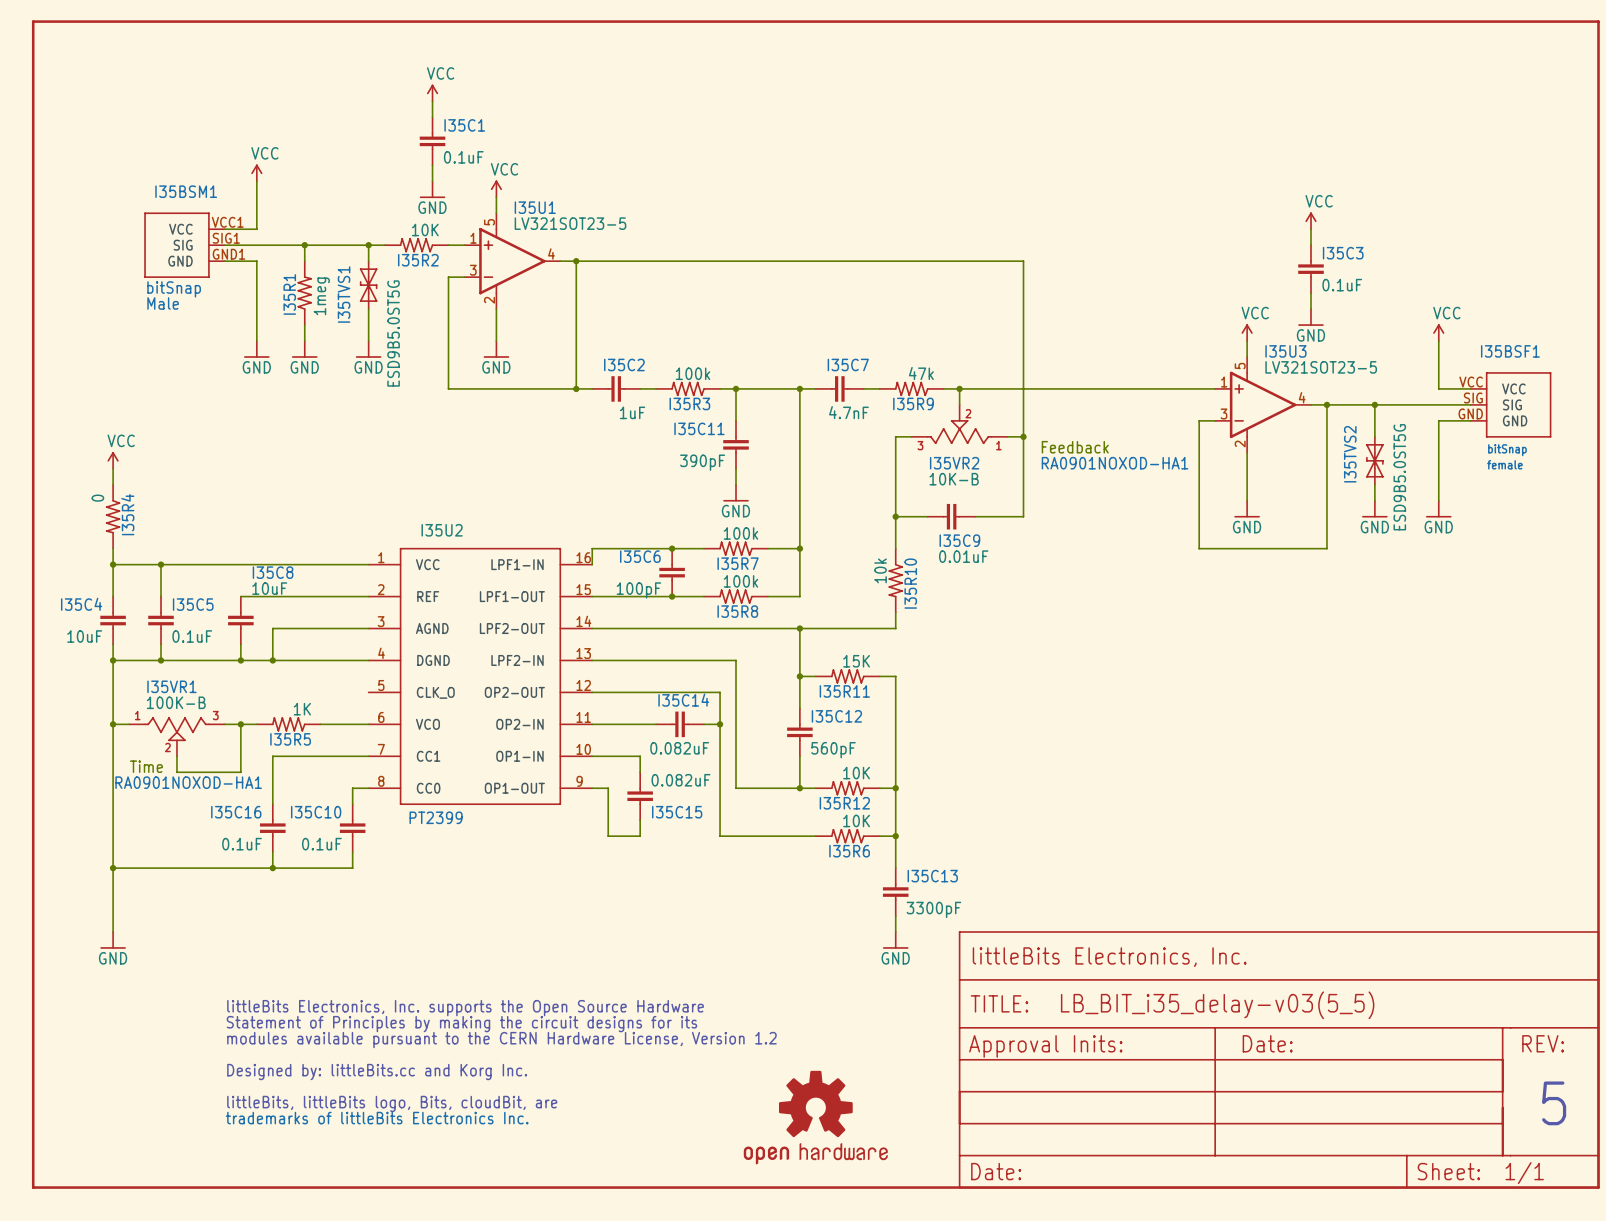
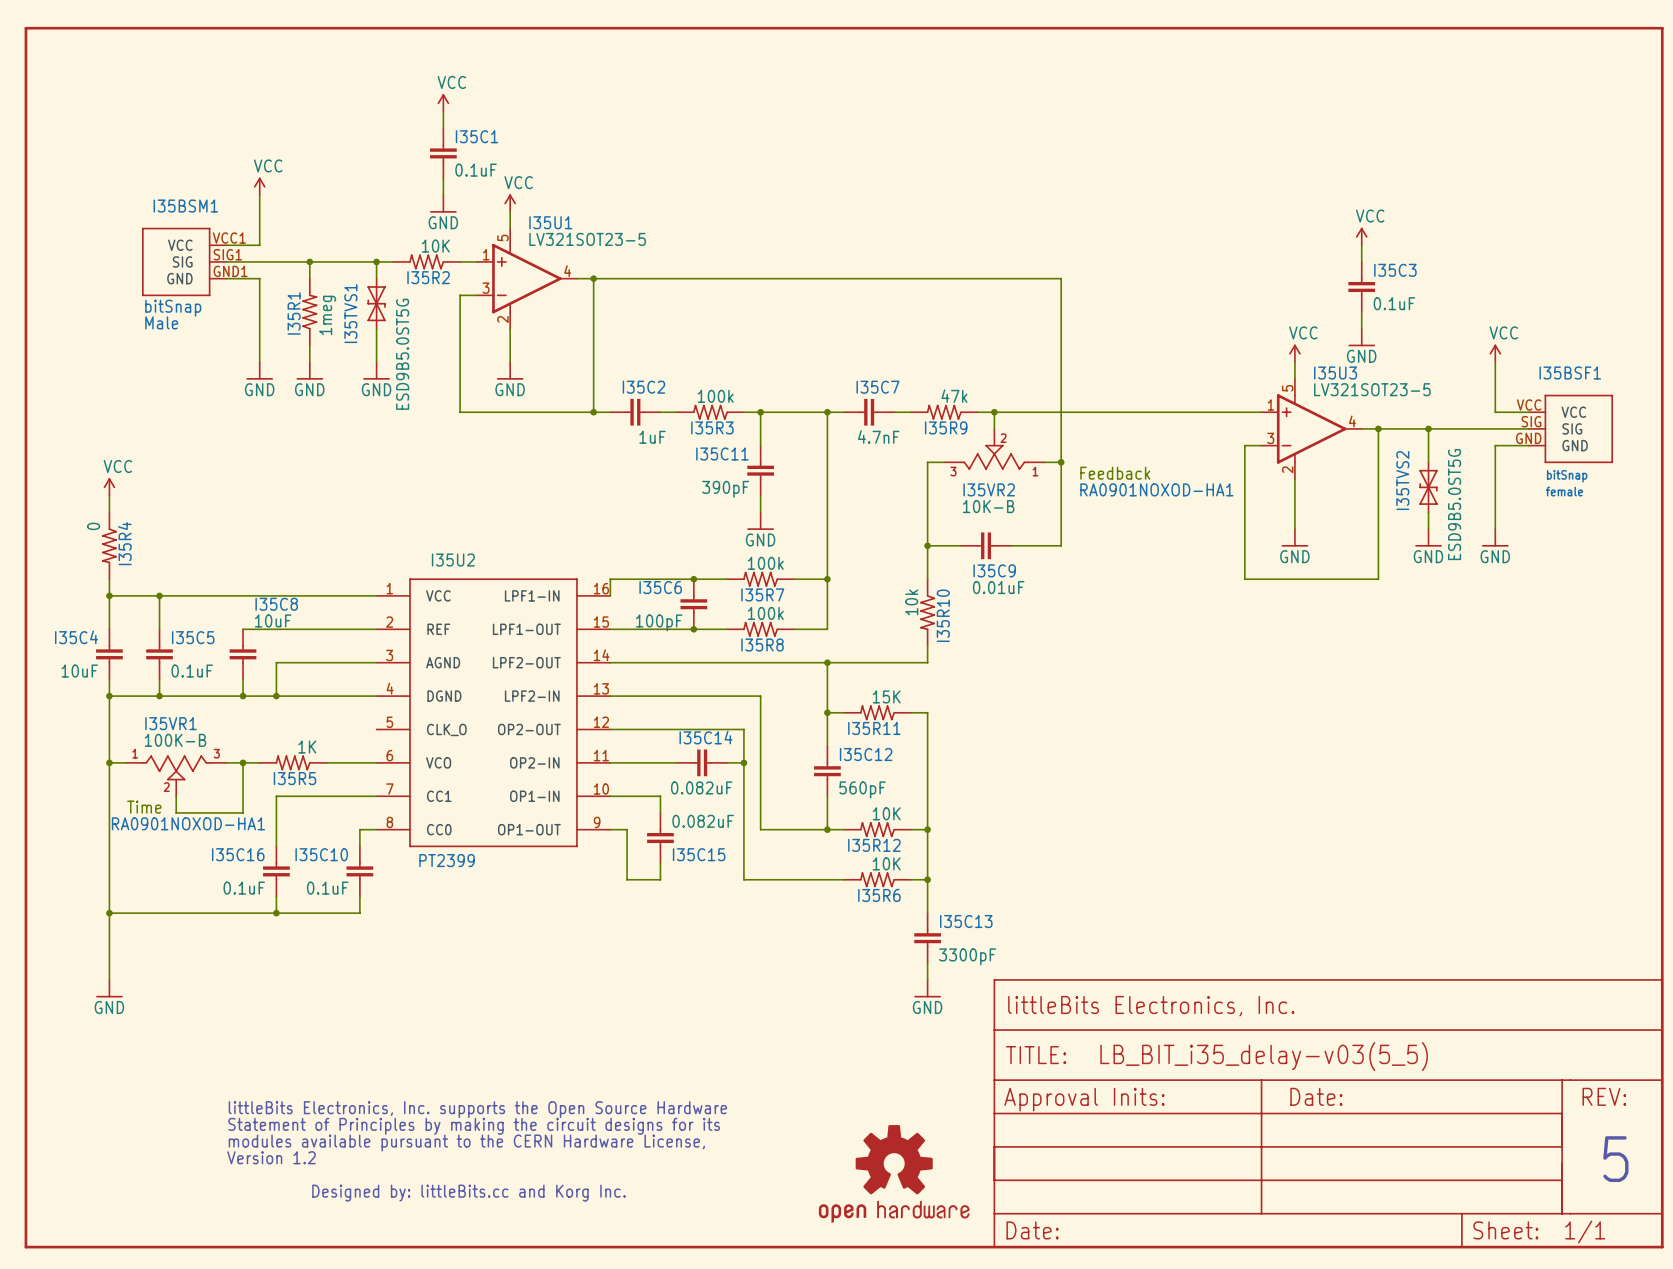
part: (501, 1062) -> none
part: none -> (477, 1151)
part position: (815, 1117) -> (894, 1173)

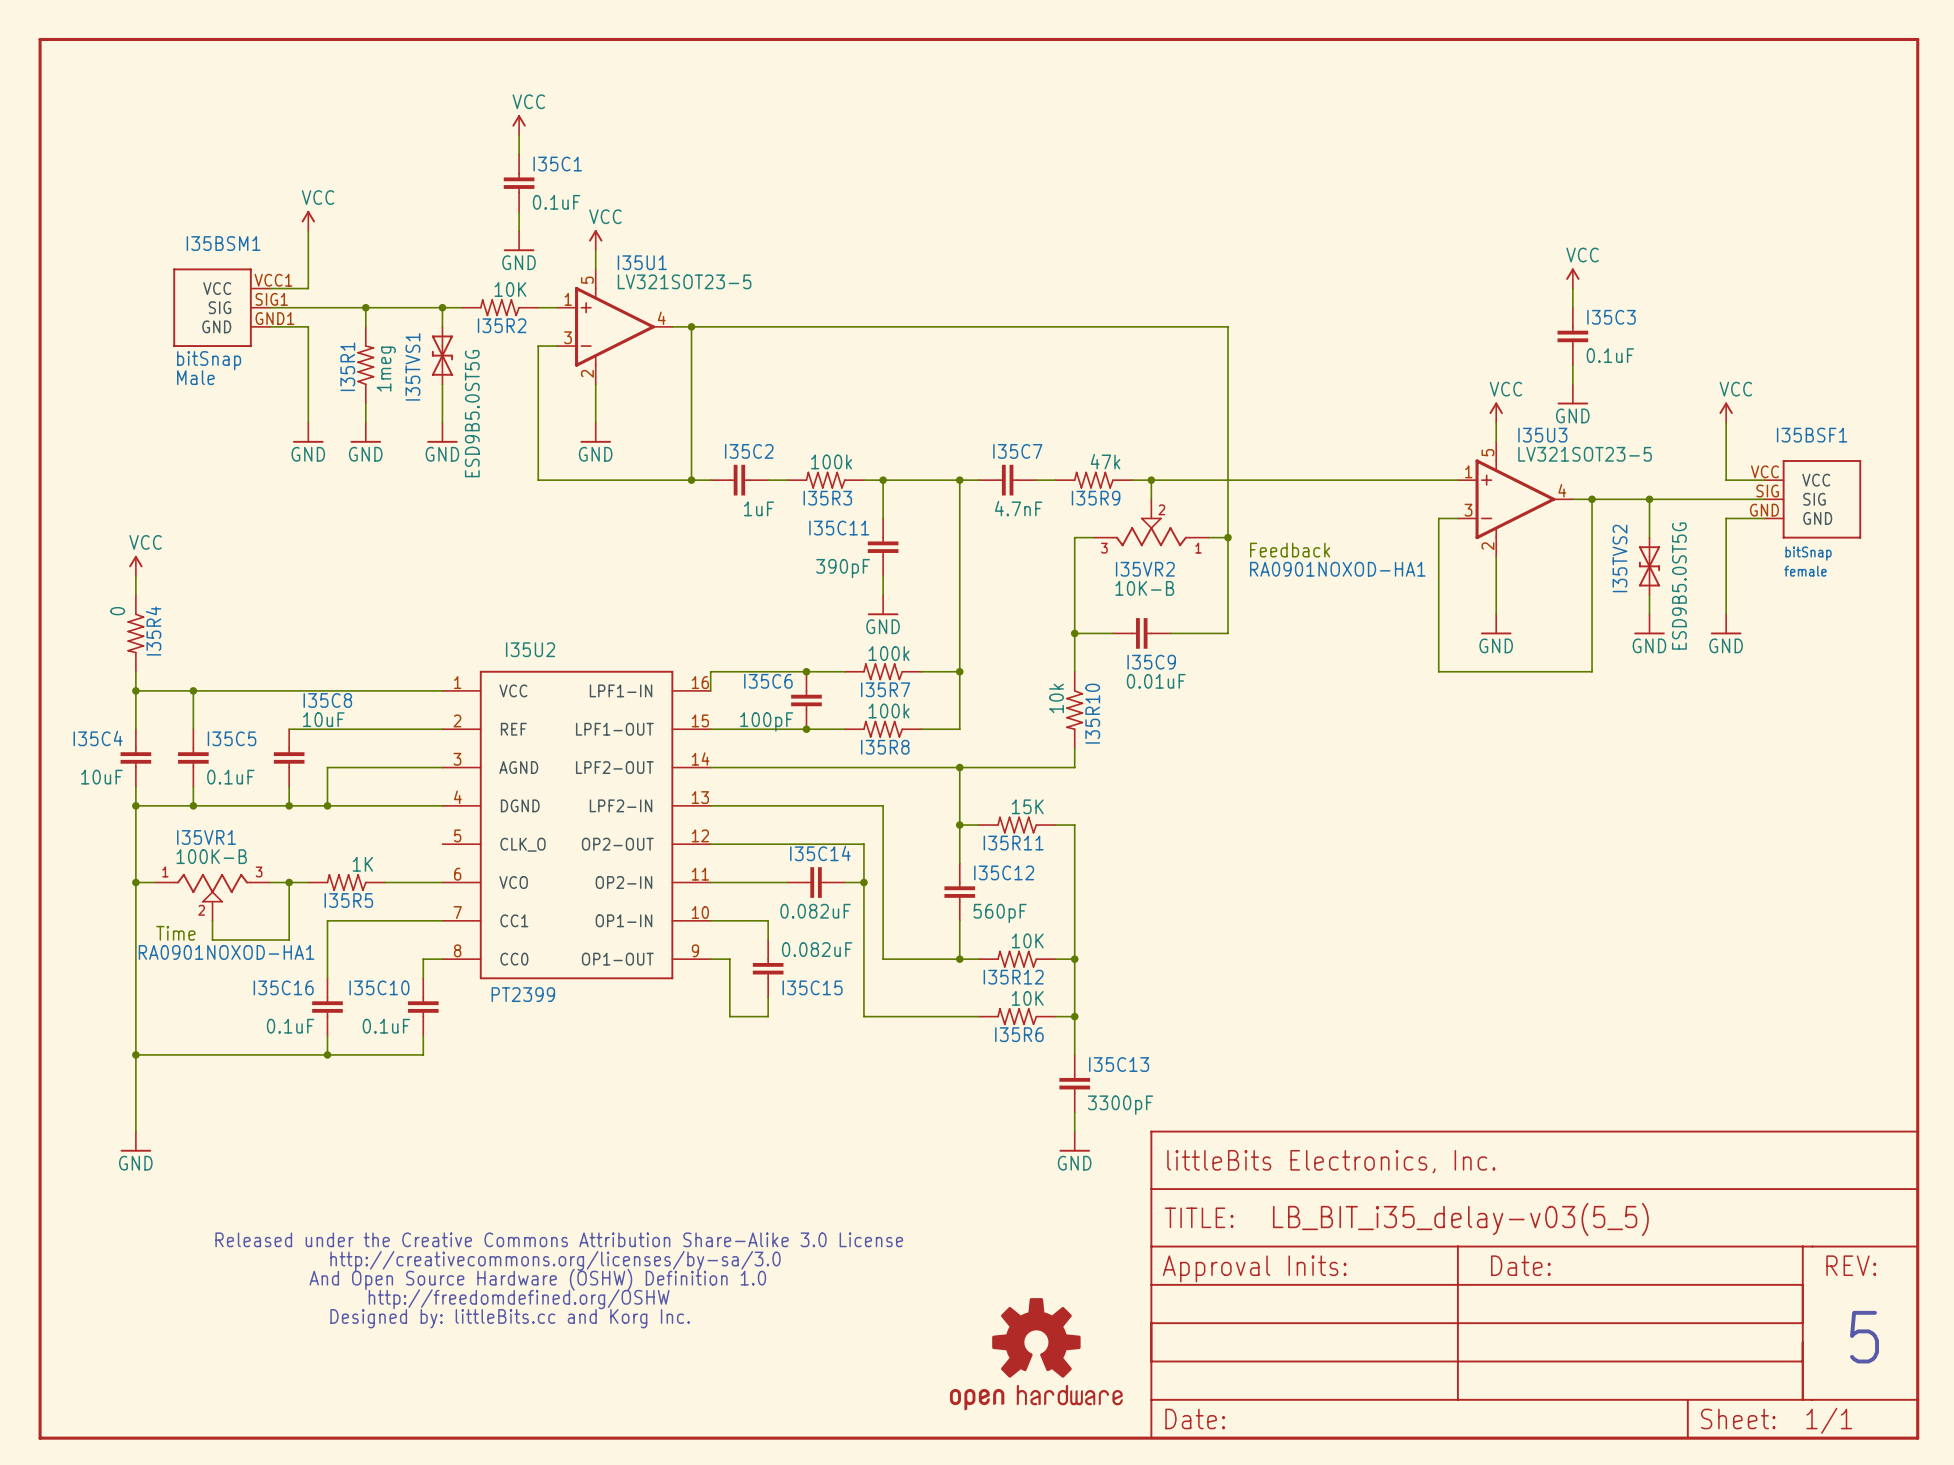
part: none -> (559, 1280)
part: (477, 1151) -> none

